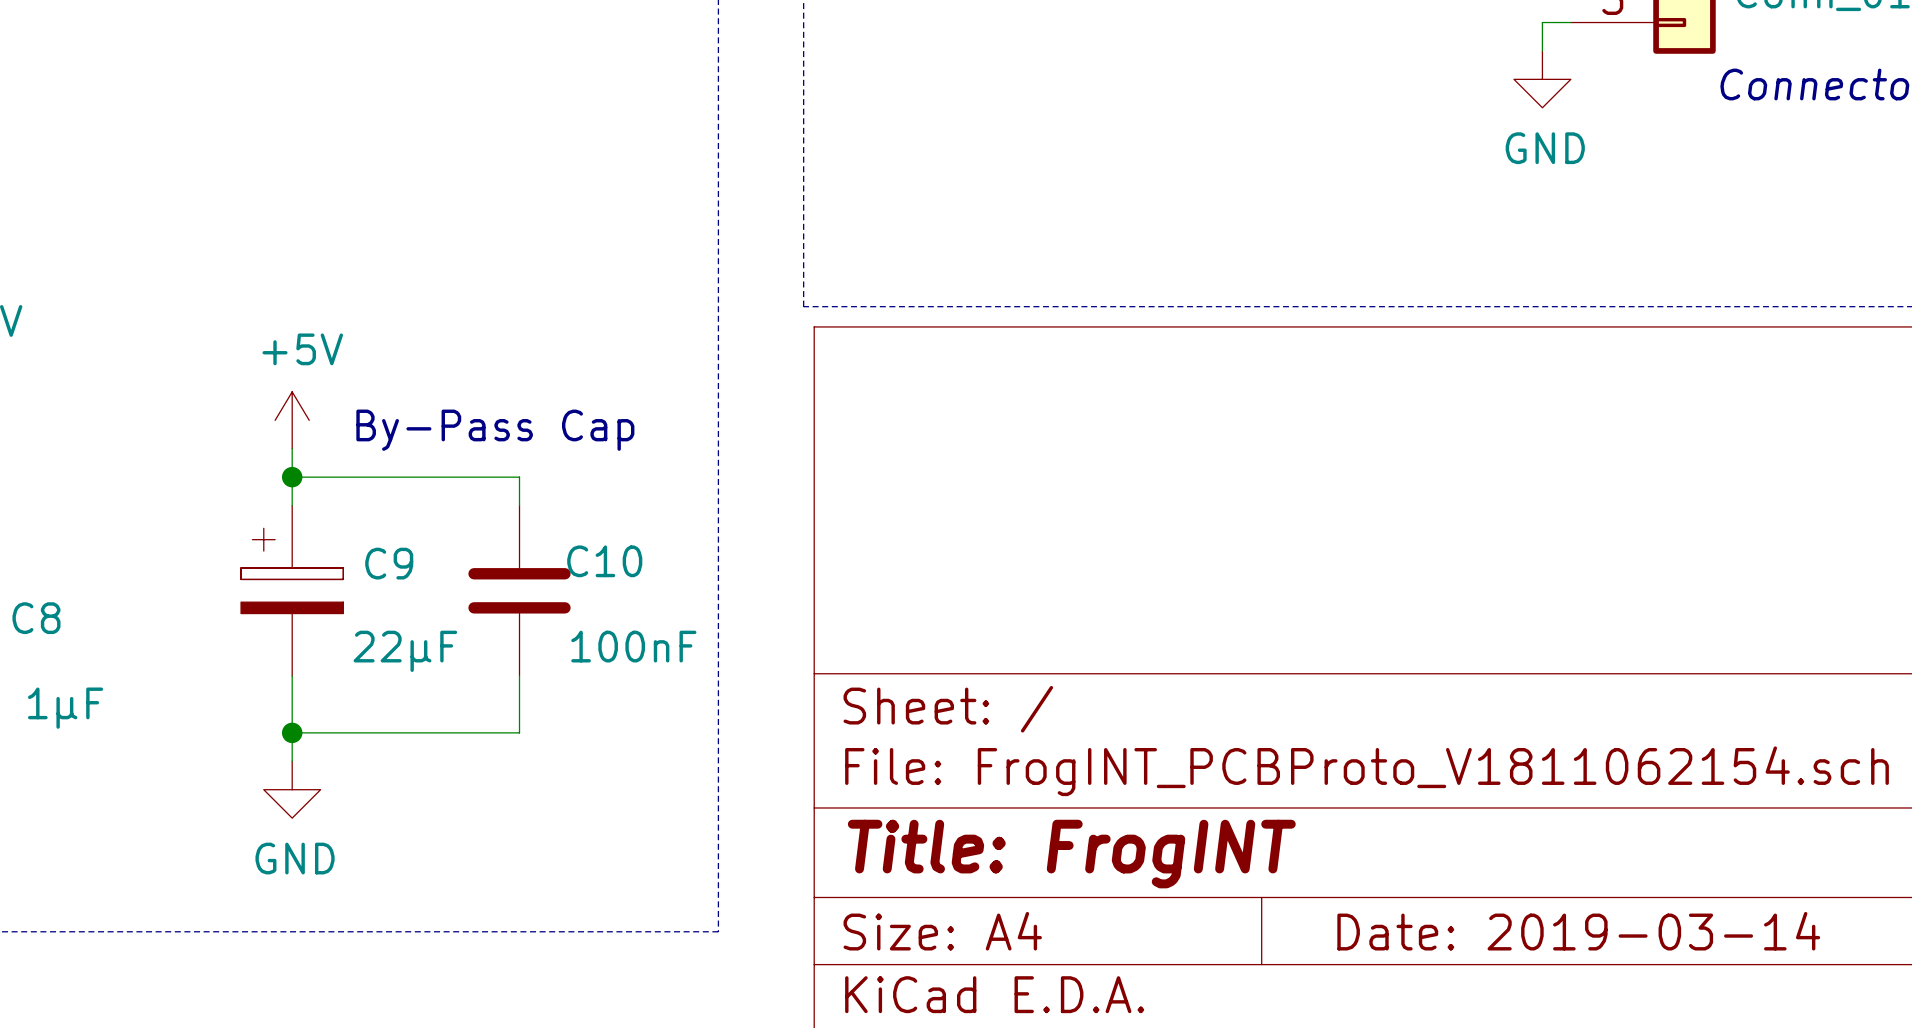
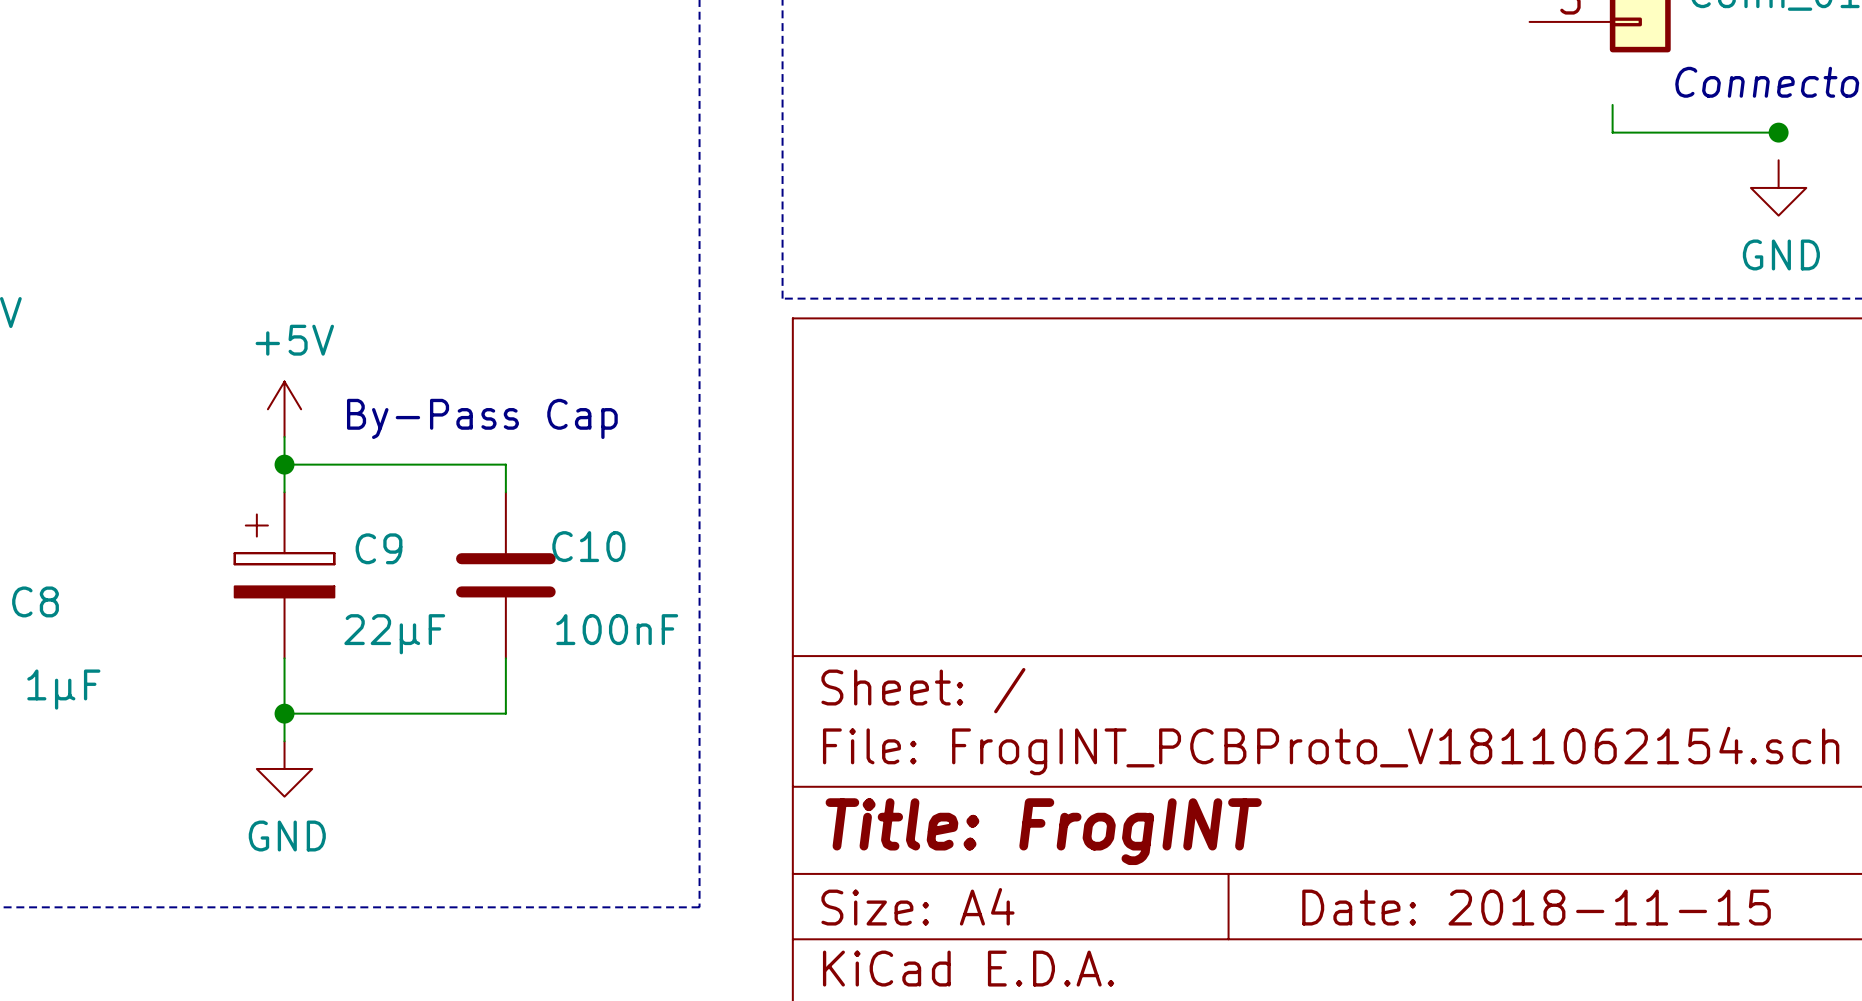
wire: (1570, 22) (1542, 22) (1542, 50) -> none
power symbol position: GND (1542, 79) -> GND (1778, 187)
wire: none -> (1612, 104) (1612, 132) (1778, 132)
junction: none -> (1778, 132)
title block: Date: 2019-03-14 (1578, 931) -> Date: 2018-11-15 (1536, 907)

